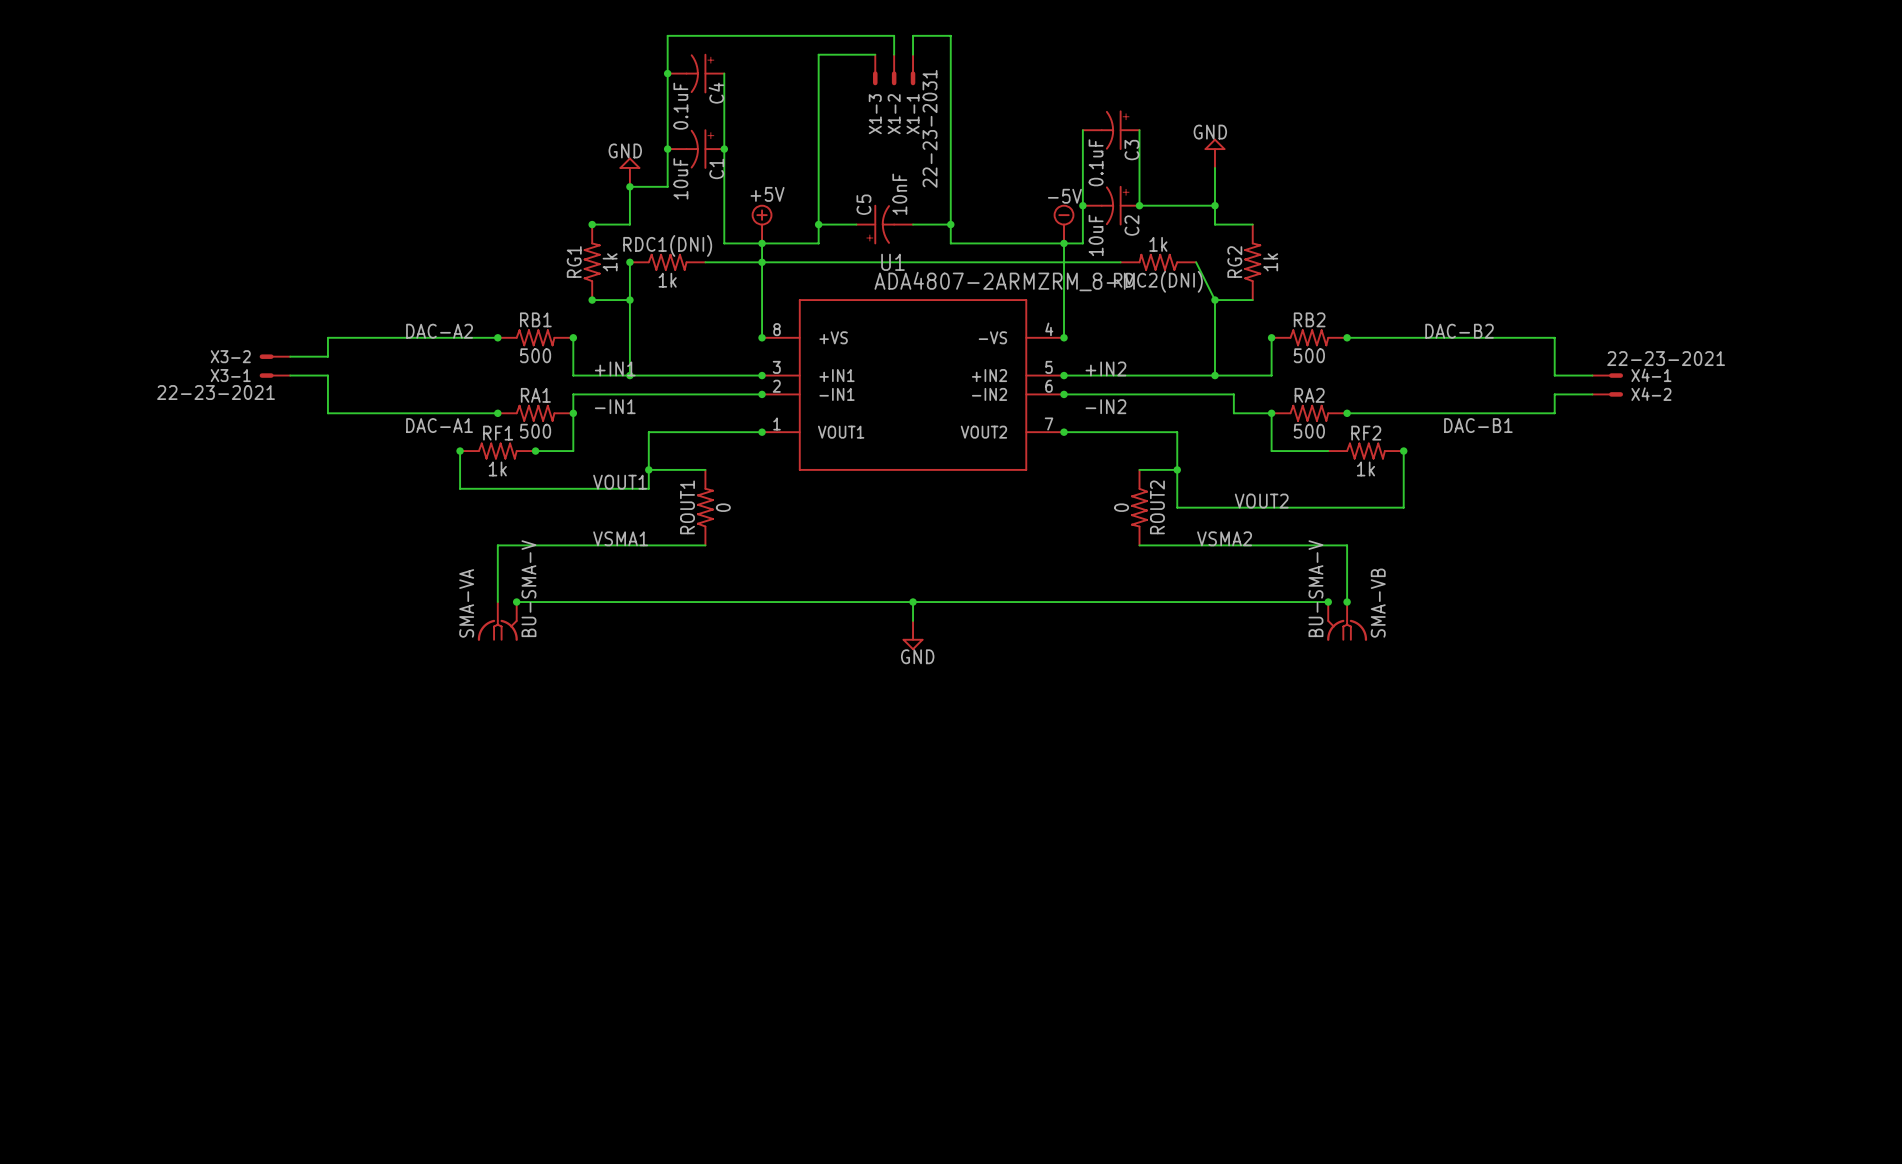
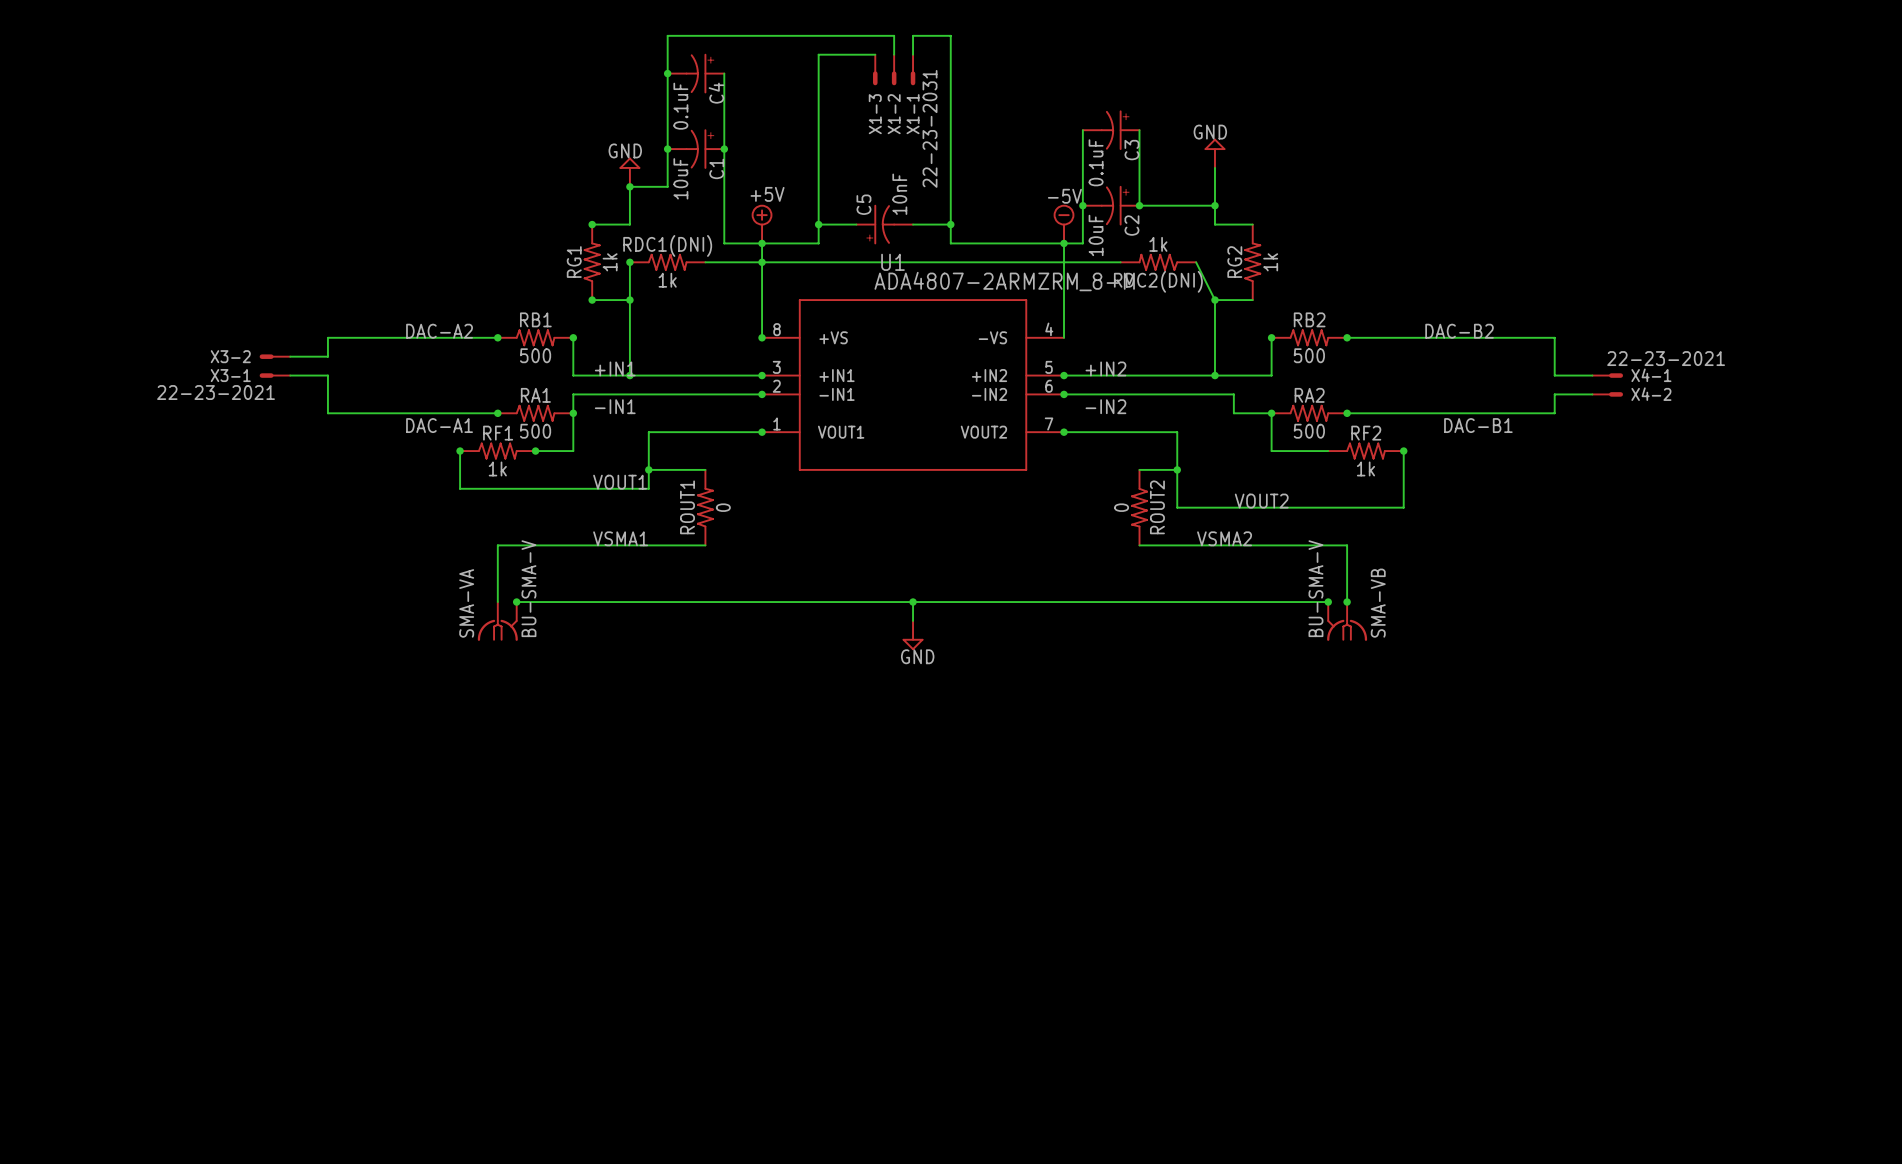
junction: (1064, 337) -> none

